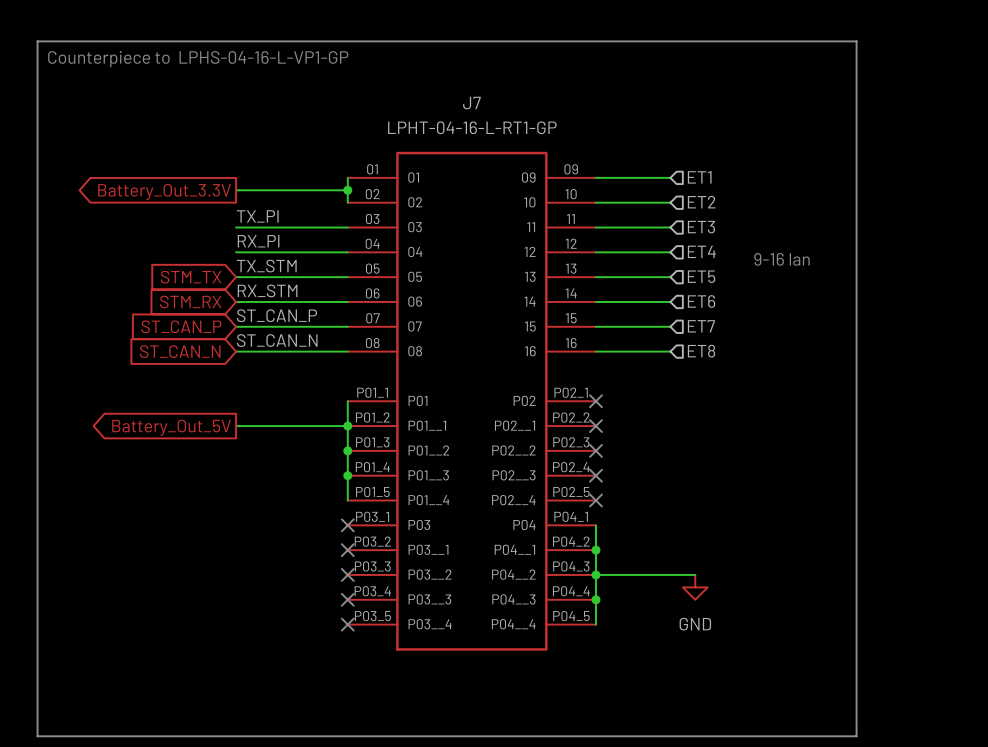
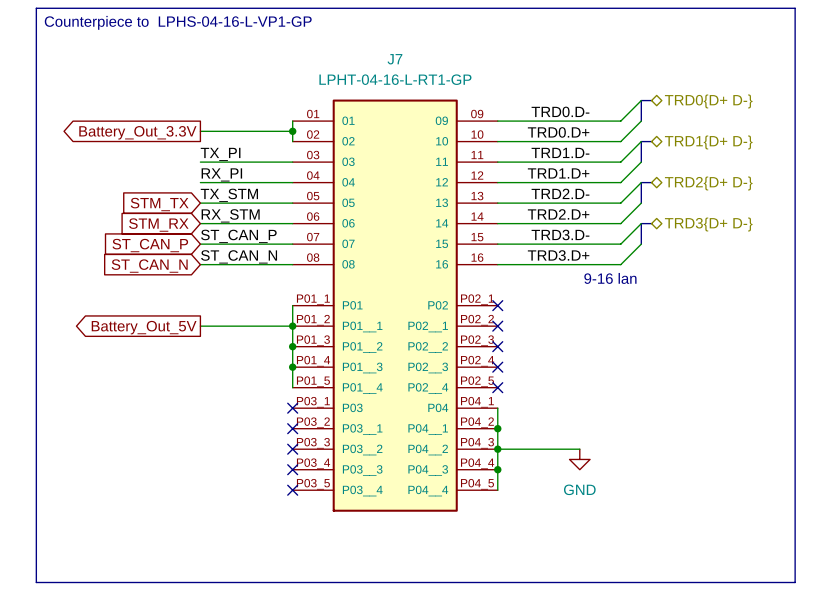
line: (856, 41) (856, 736) -> (713, 8) (795, 8) (795, 582) (713, 582)
wire: none -> (641, 100) (620, 121) (559, 121)
bus: none -> (651, 100) (641, 100) (641, 121)
hierarchical label: none -> TRD0{D+ D-} (708, 101)
label: none -> TRD0.D- (560, 111)
hierarchical label: ET1 (699, 177) -> none
wire: none -> (641, 121) (620, 141) (559, 141)
label: none -> TRD0.D+ (558, 132)
hierarchical label: ET2 (701, 202) -> none
wire: none -> (641, 141) (620, 162) (559, 162)
bus: none -> (651, 141) (641, 141) (641, 162)
hierarchical label: none -> TRD1{D+ D-} (708, 142)
label: none -> TRD1.D- (560, 152)
hierarchical label: ET3 (701, 227) -> none
wire: none -> (641, 162) (620, 182) (559, 182)
label: none -> TRD1.D+ (558, 173)
hierarchical label: ET4 (701, 251) -> none
wire: none -> (641, 182) (620, 203) (559, 203)
bus: none -> (651, 182) (641, 182) (641, 203)
hierarchical label: none -> TRD2{D+ D-} (708, 183)
text position: 9-16 lan (781, 259) -> 9-16 lan (610, 278)
label: none -> TRD2.D- (560, 193)
hierarchical label: ET5 (701, 276) -> none
wire: none -> (641, 203) (620, 223) (559, 223)
label: none -> TRD2.D+ (558, 214)
hierarchical label: ET6 (701, 301) -> none
wire: none -> (641, 223) (620, 244) (559, 244)
bus: none -> (651, 223) (641, 223) (641, 244)
hierarchical label: none -> TRD3{D+ D-} (708, 224)
label: none -> TRD3.D- (560, 234)
hierarchical label: ET7 (701, 326) -> none
wire: none -> (641, 244) (620, 264) (559, 264)
label: none -> TRD3.D+ (558, 255)
hierarchical label: ET8 (701, 351) -> none

